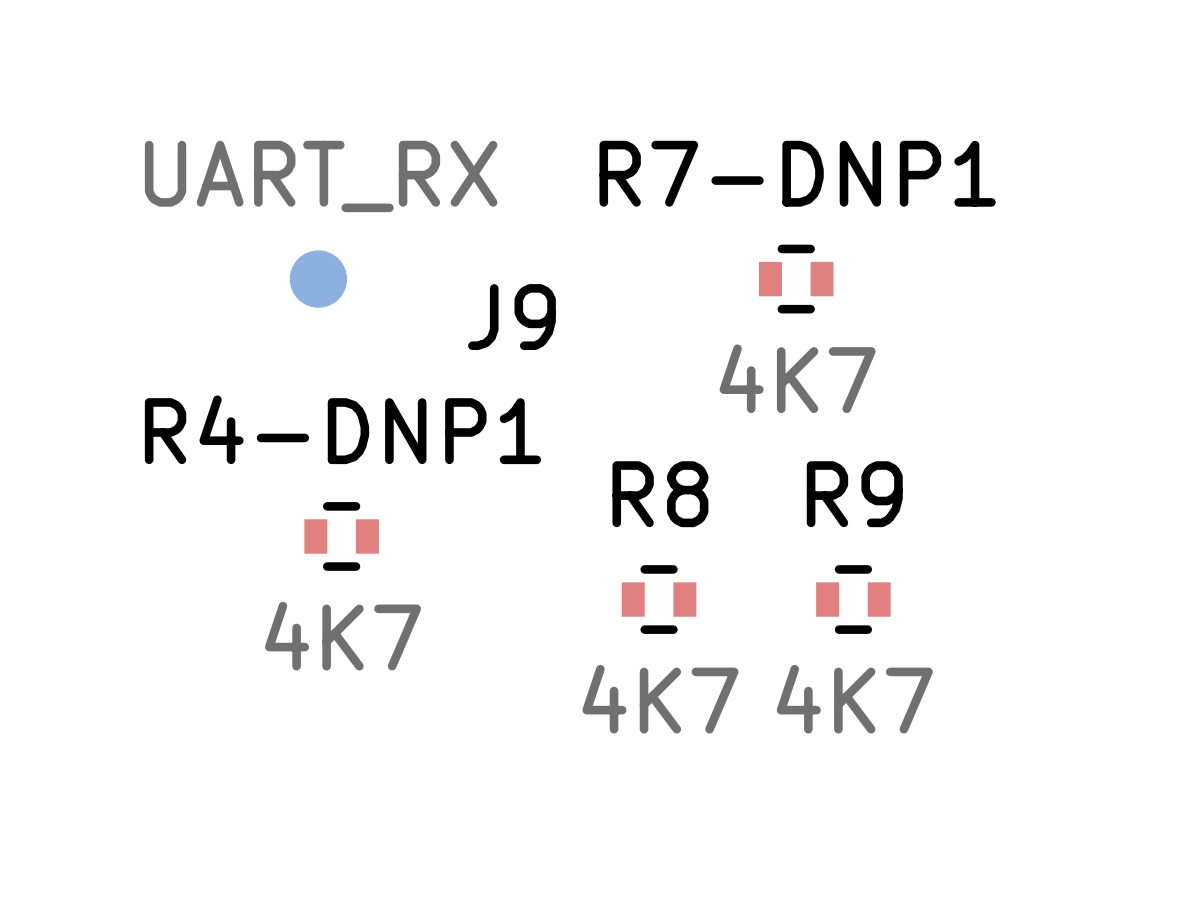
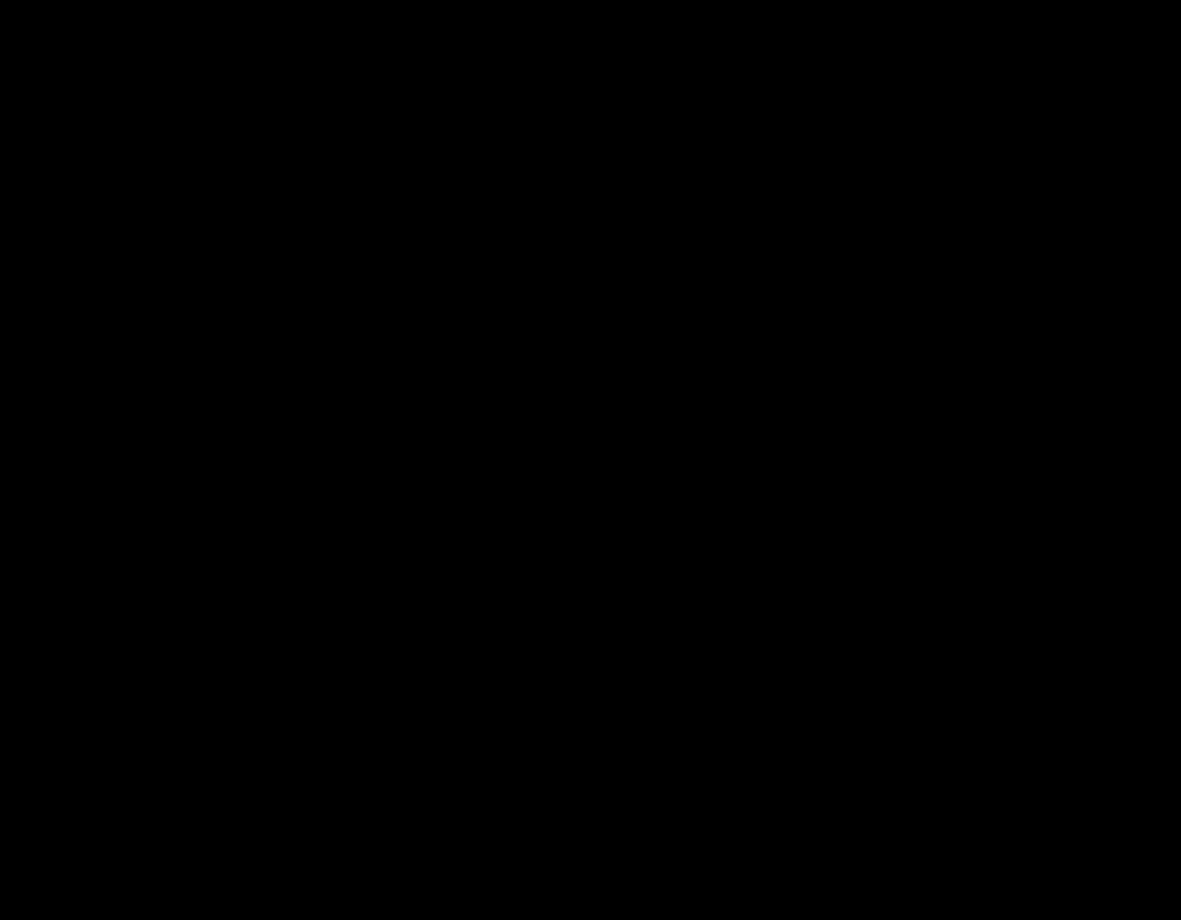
J9: UART_RX (318, 279) -> none
R7-DNP1: 4K7 (796, 279) -> none
R4-DNP1: 4K7 (341, 536) -> none
R8: 4K7 (659, 599) -> none
R9: 4K7 (853, 599) -> none

